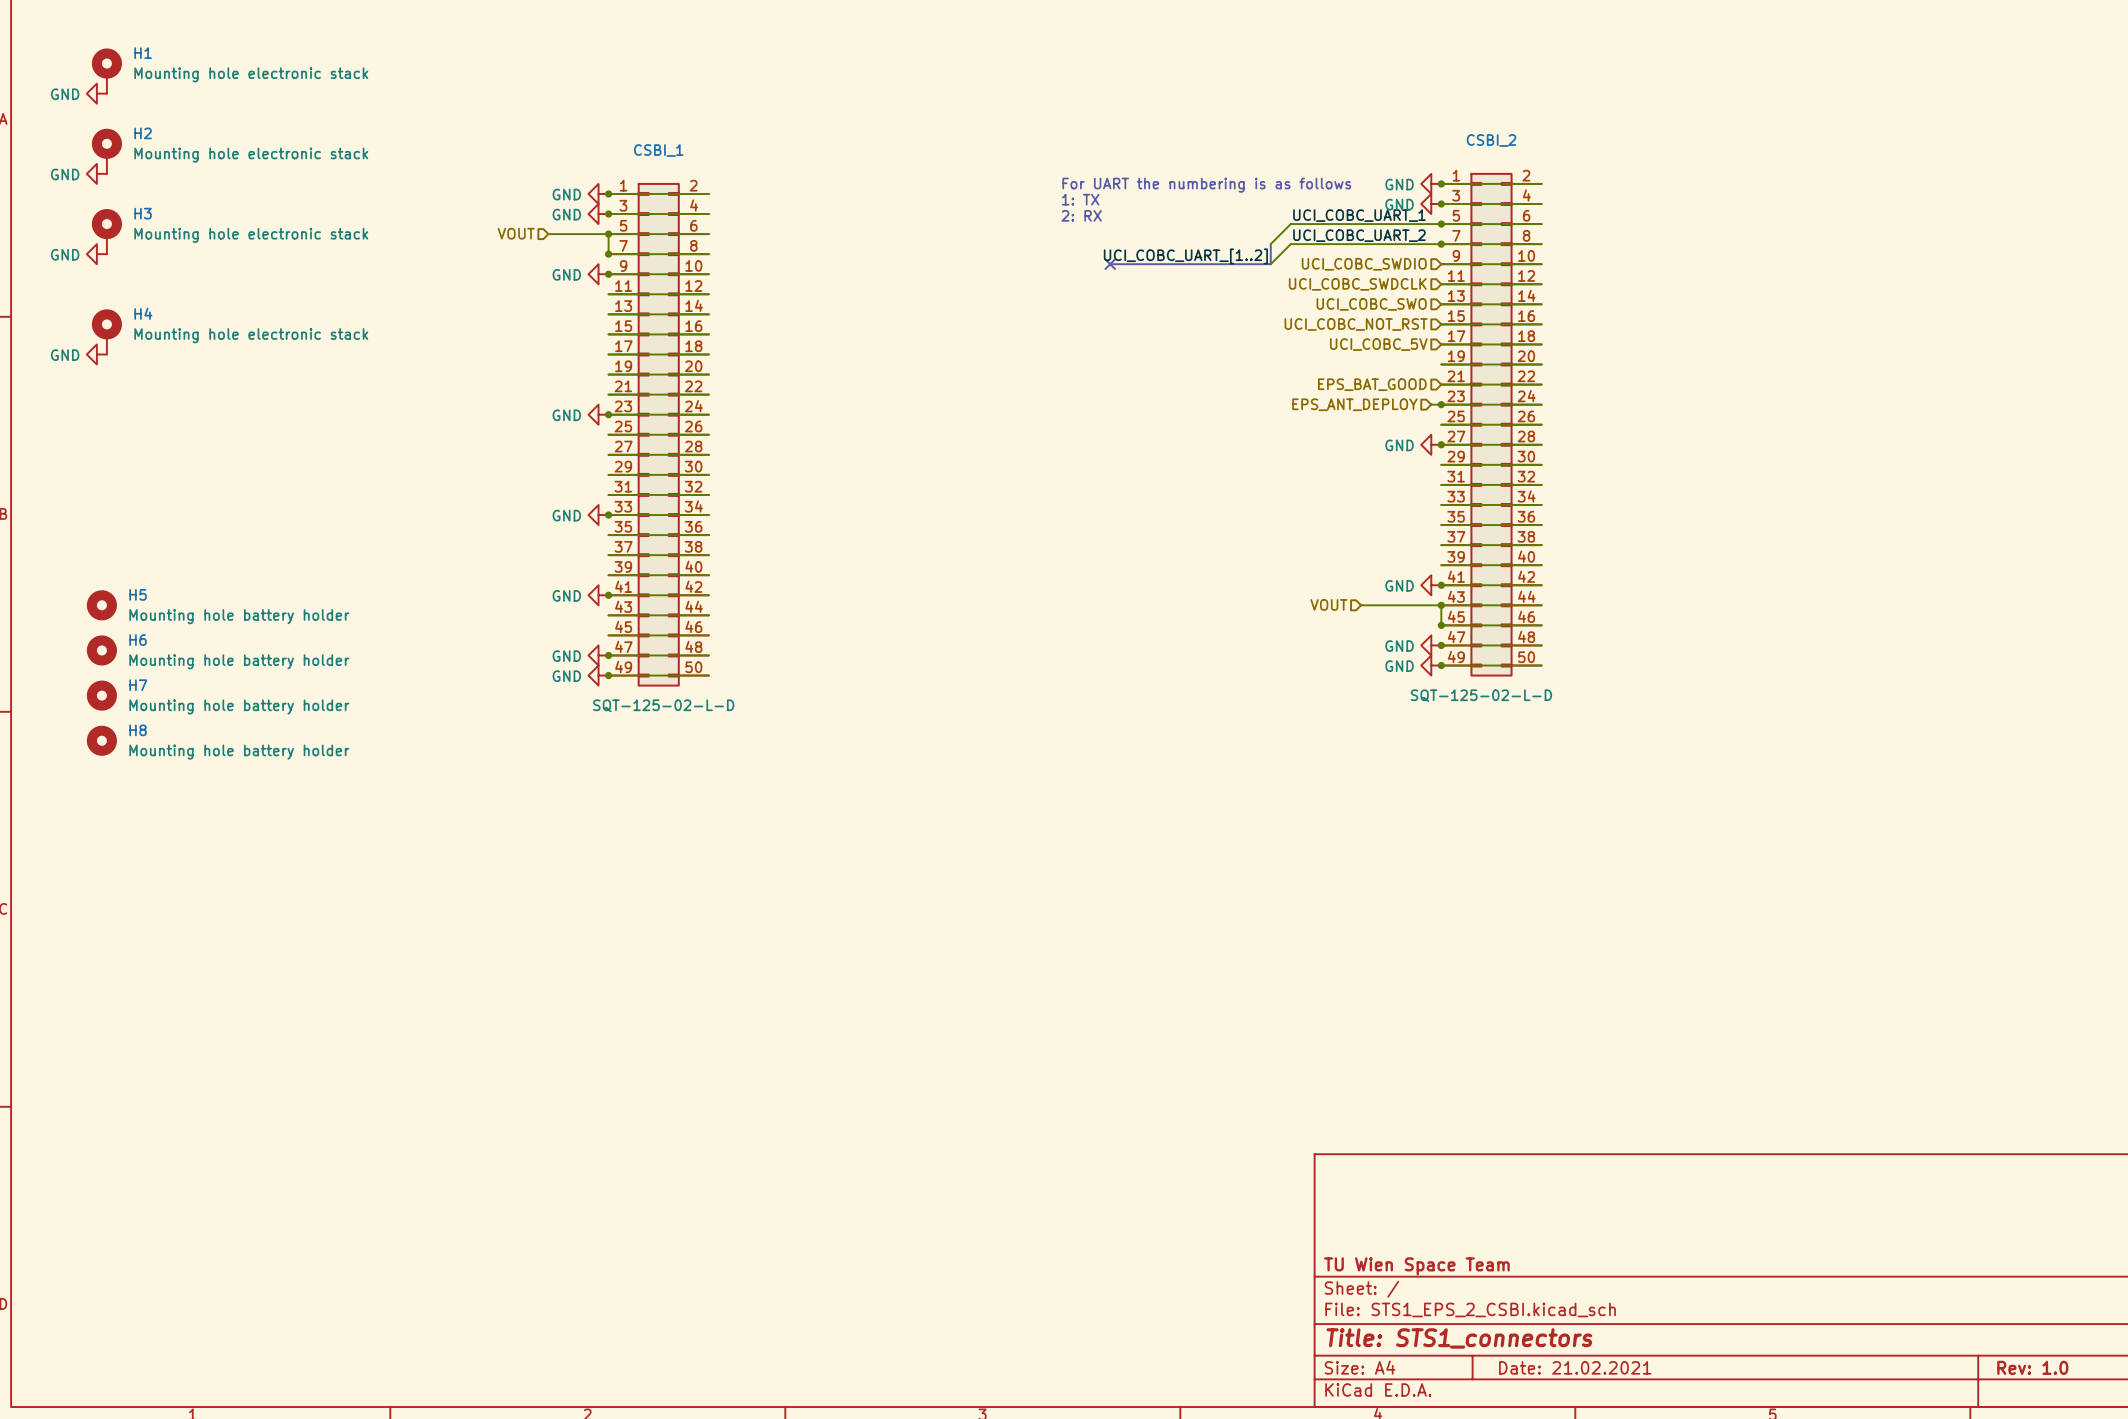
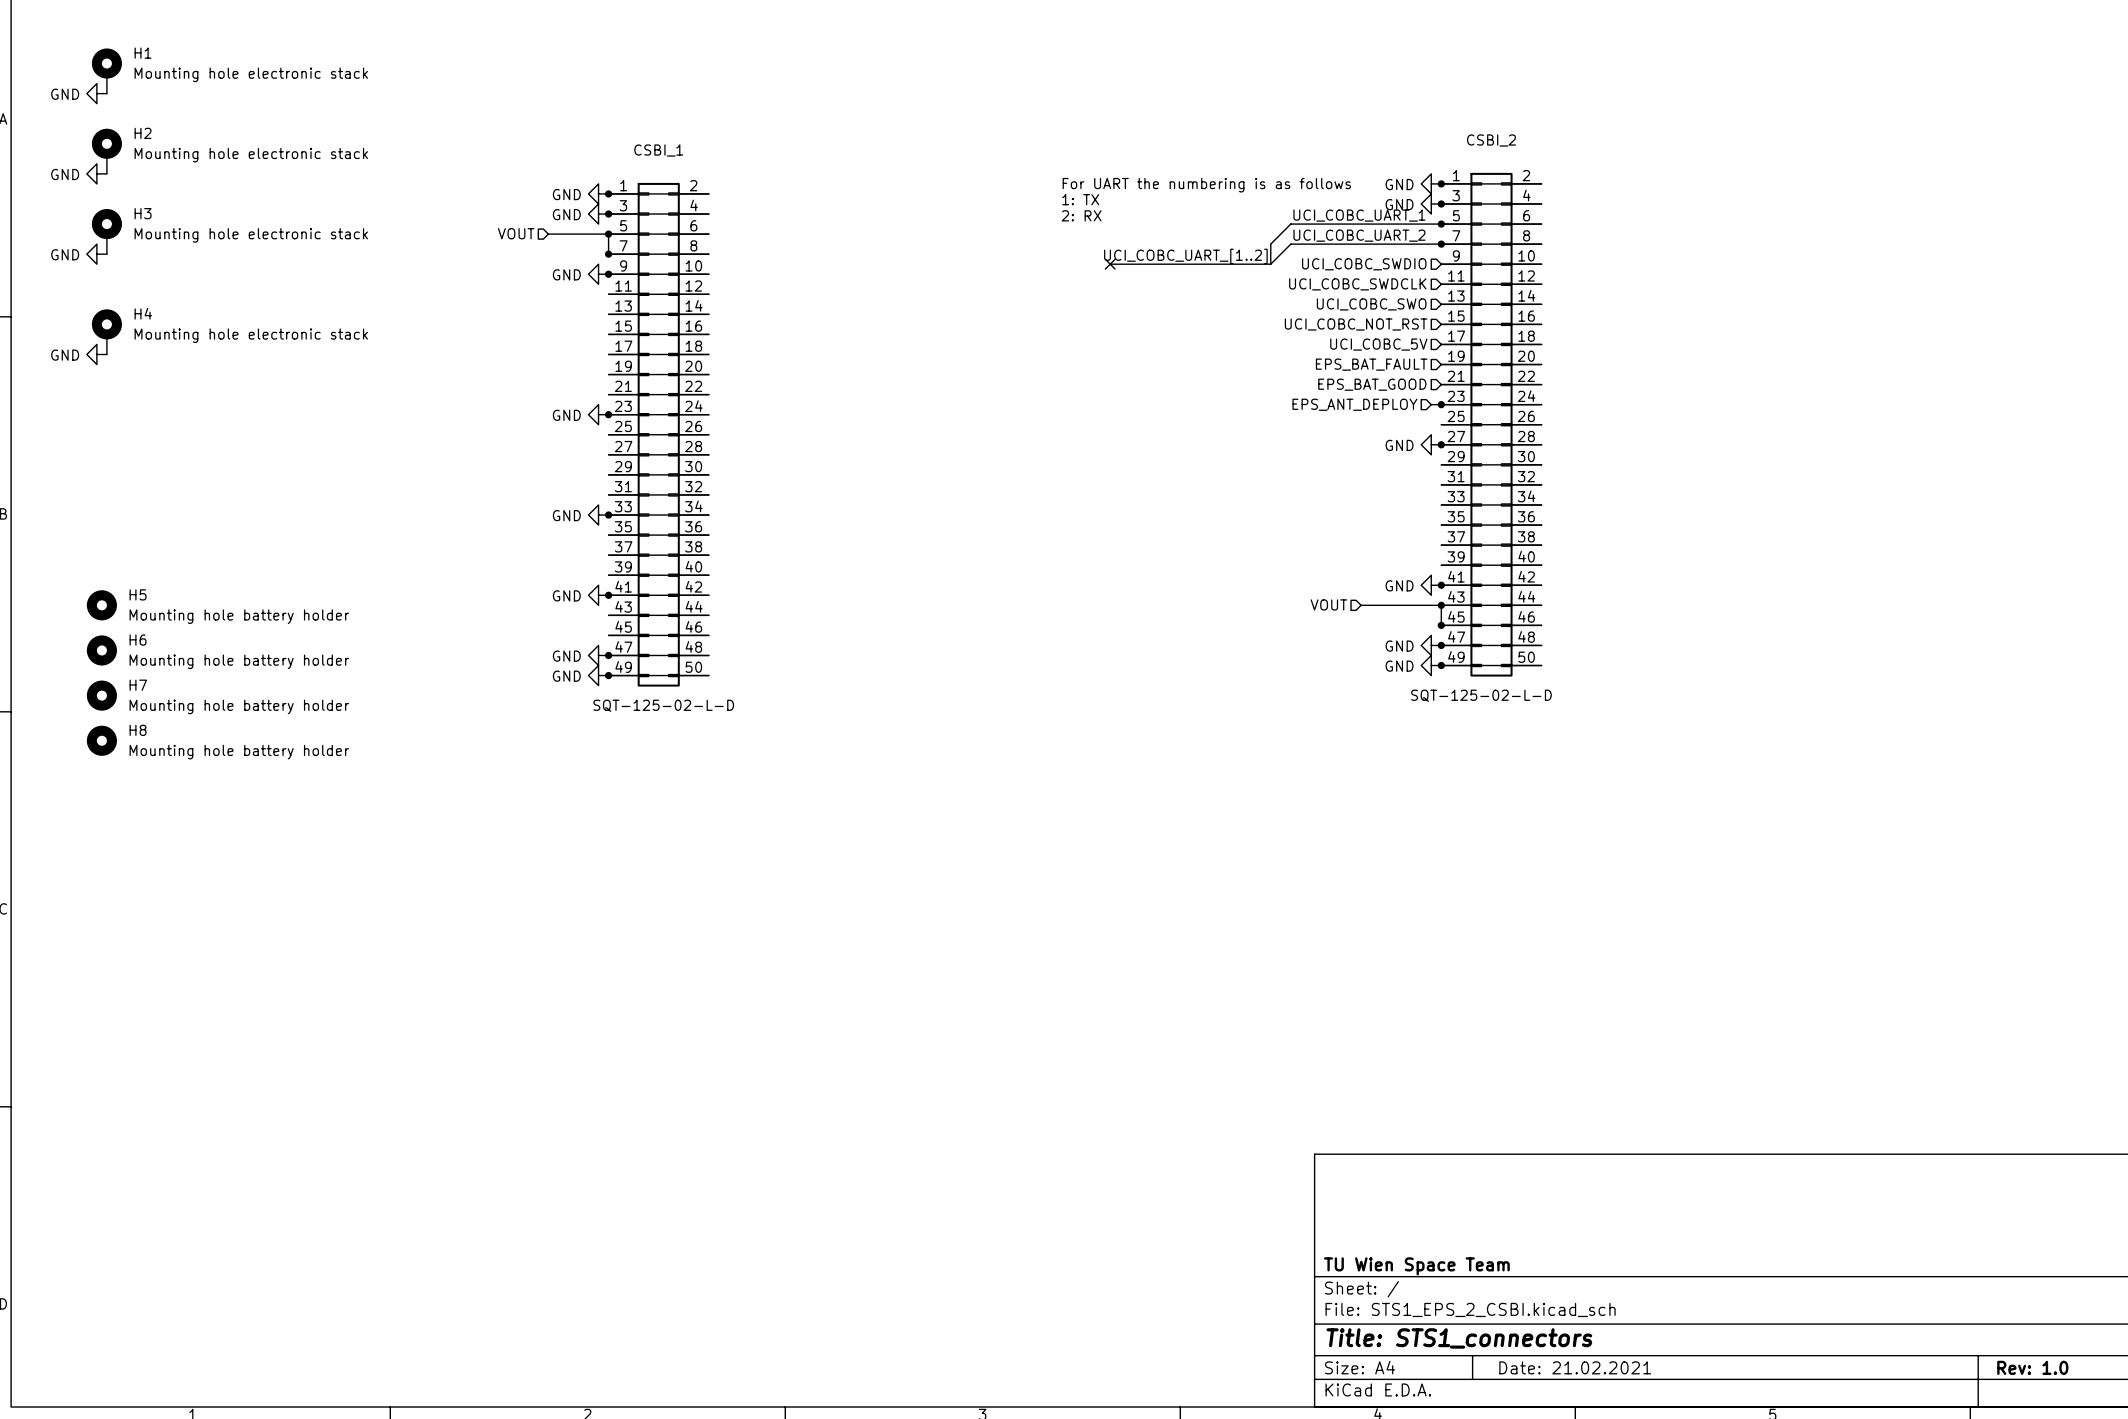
hierarchical label: none -> EPS_BAT_FAULT (1371, 364)

